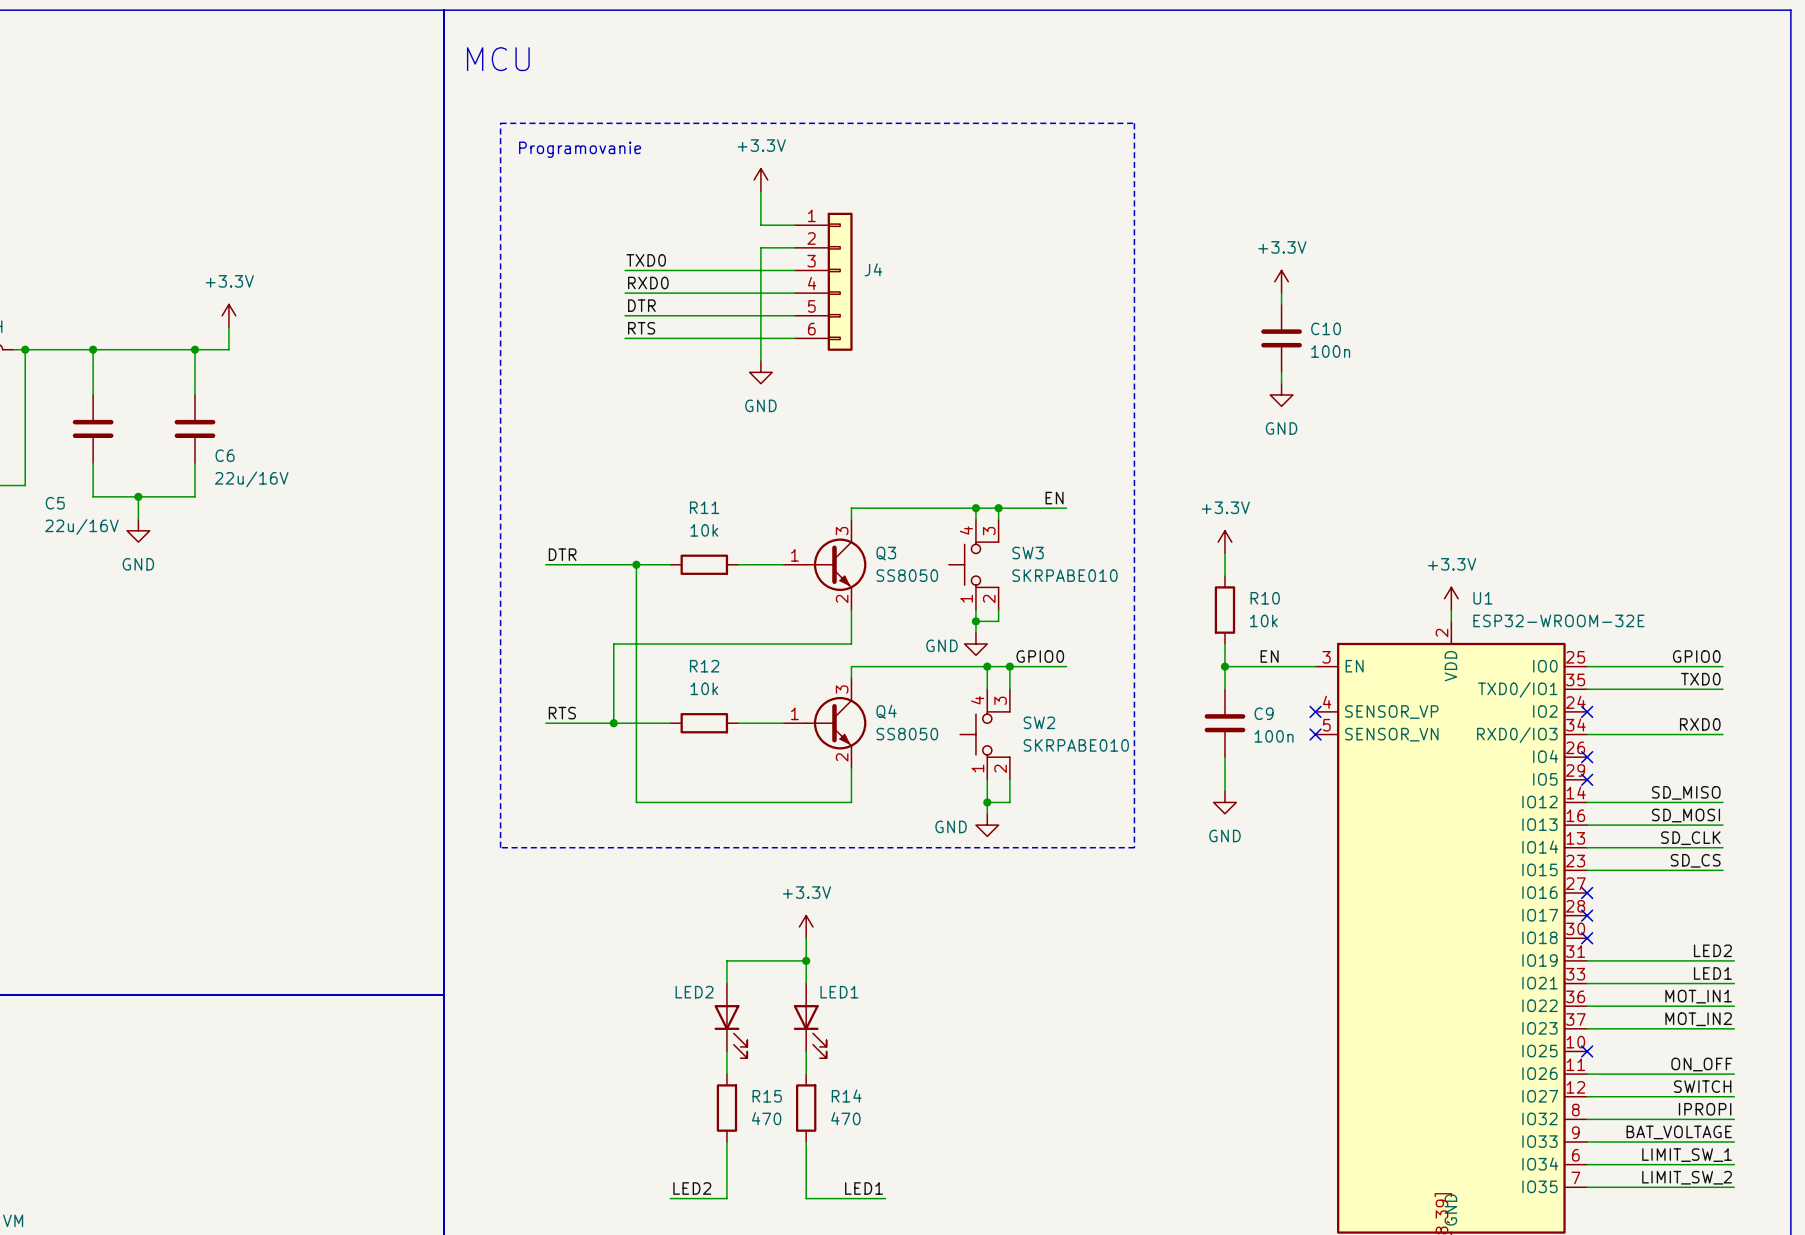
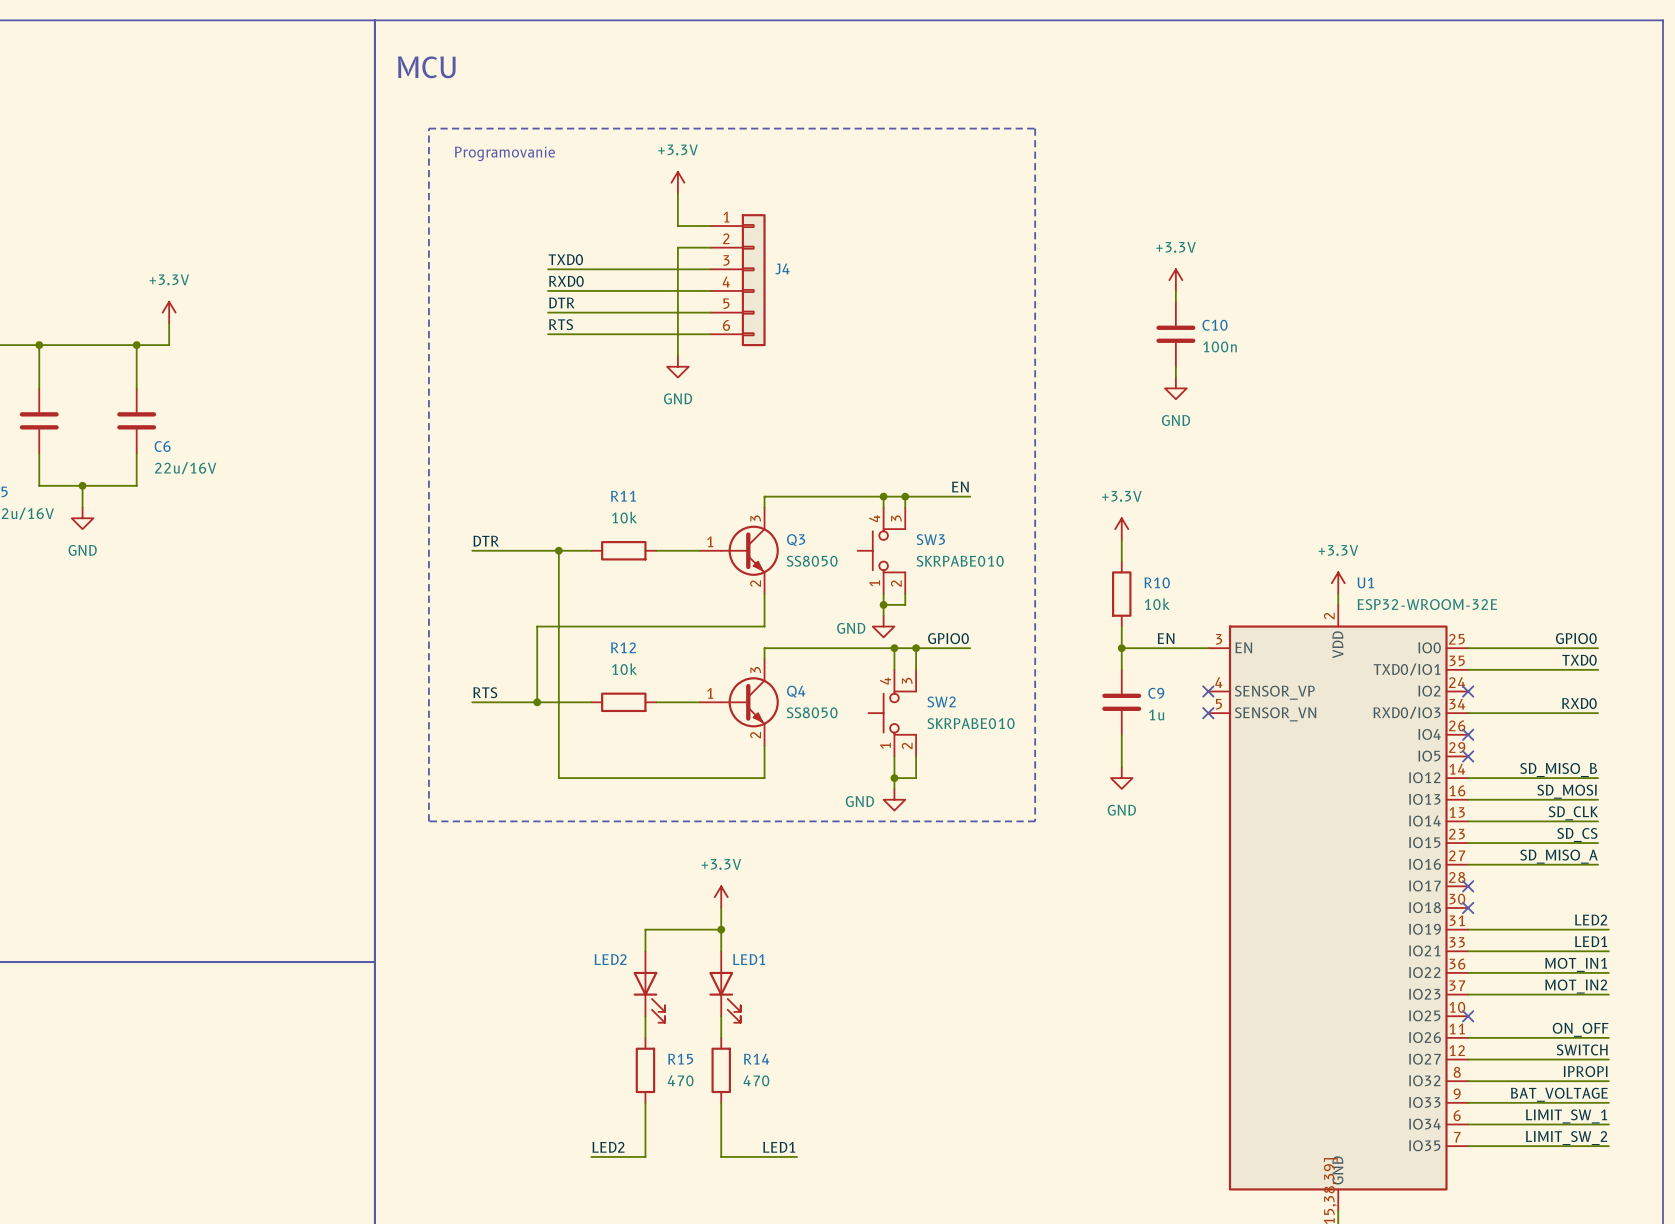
C9 value: 100n (1274, 736) -> 1u (1156, 714)
label: SD_MISO (1686, 792) -> SD_MISO_B (1558, 770)
label: none -> SD_MISO_A (1558, 856)
wire: none -> (1468, 864) (1598, 864)
no-connect mark: (1587, 893) -> none

